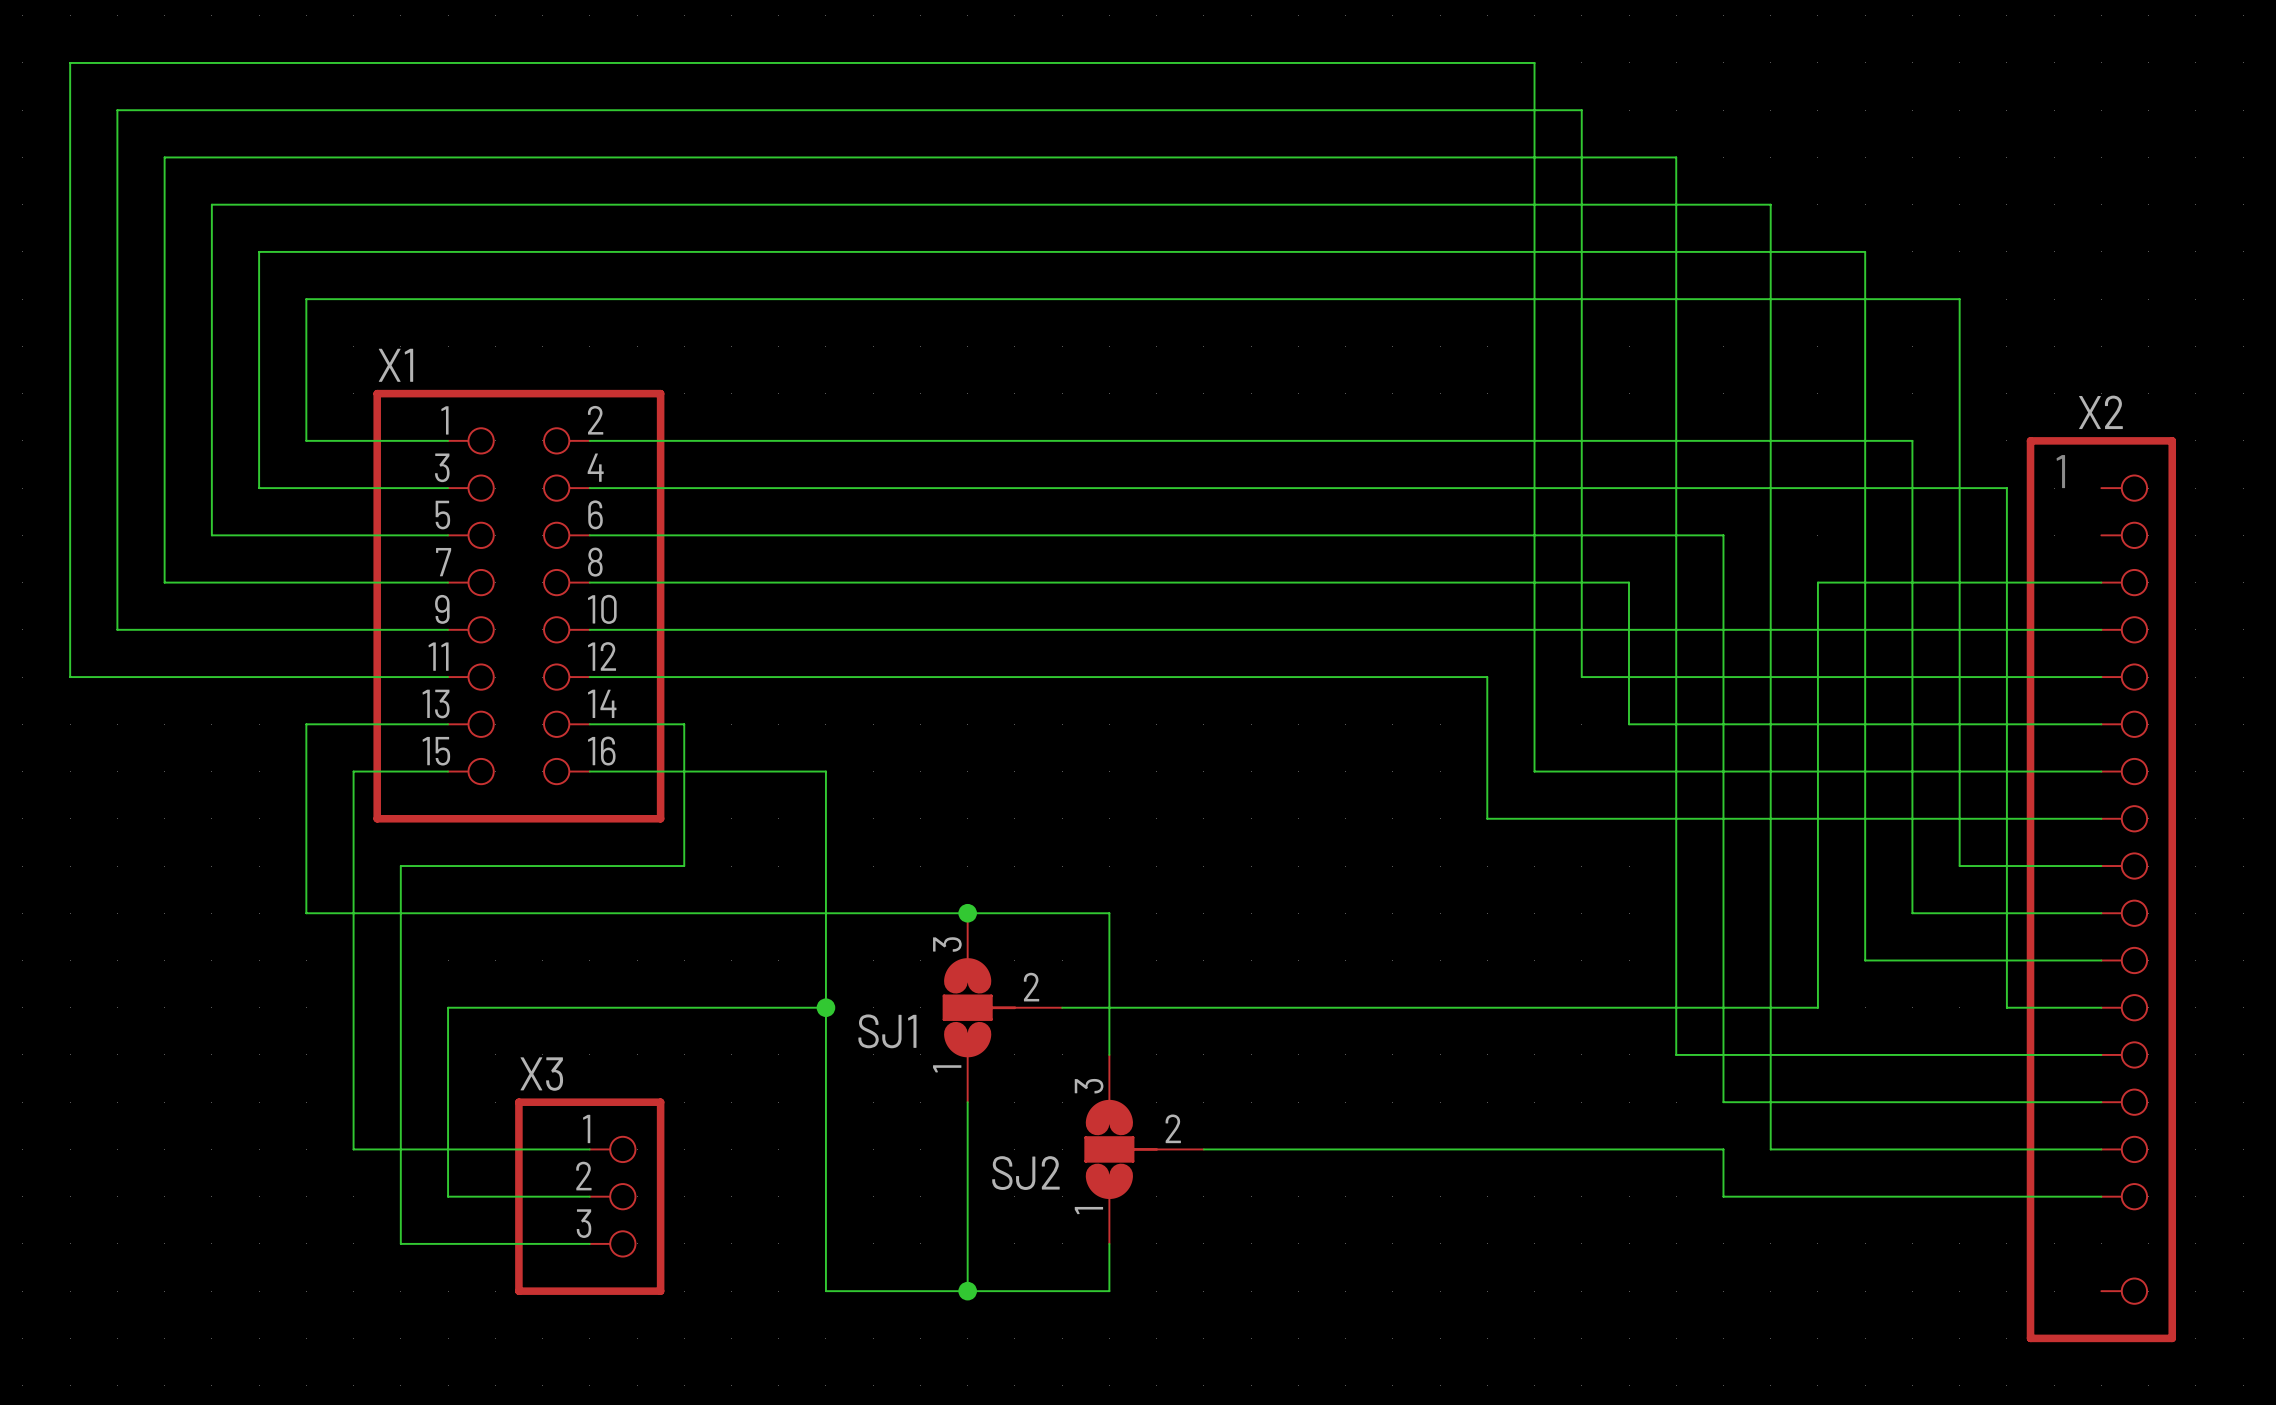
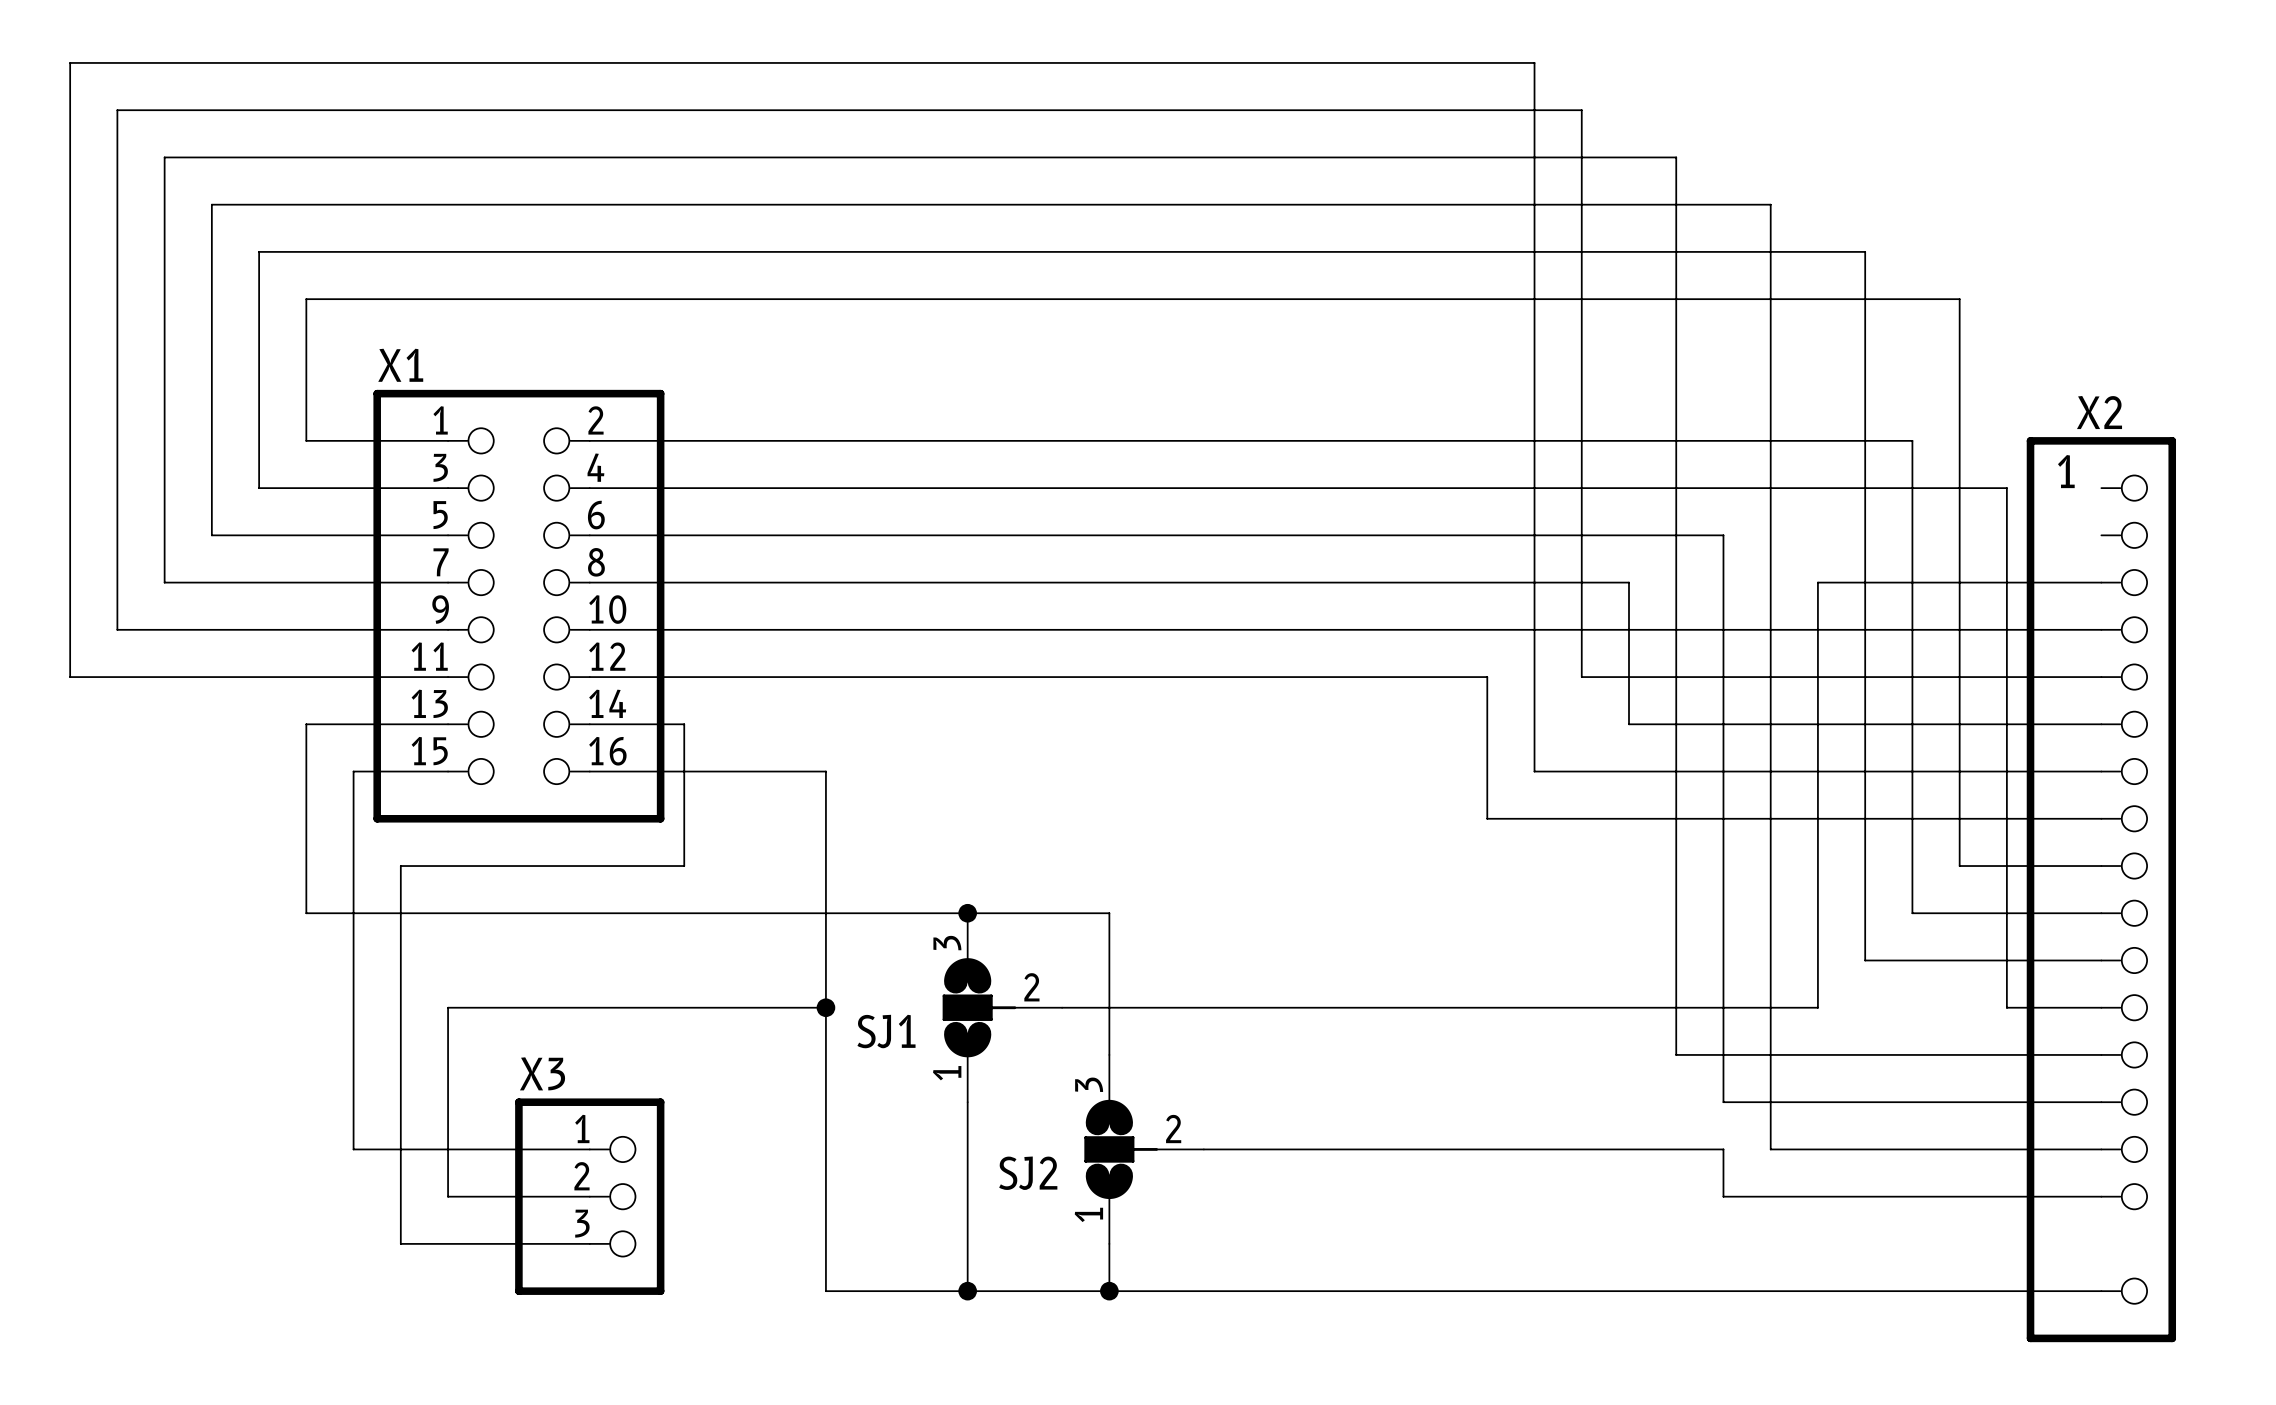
wire: none -> (1109, 1291) (2101, 1291)
junction: none -> (1109, 1291)

